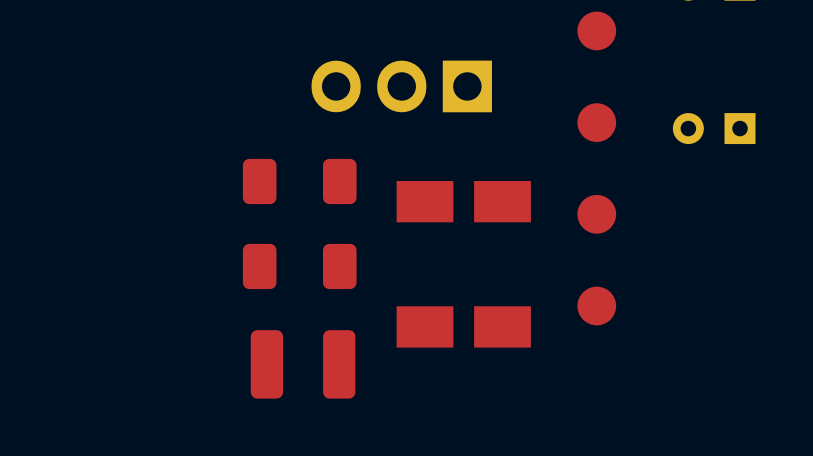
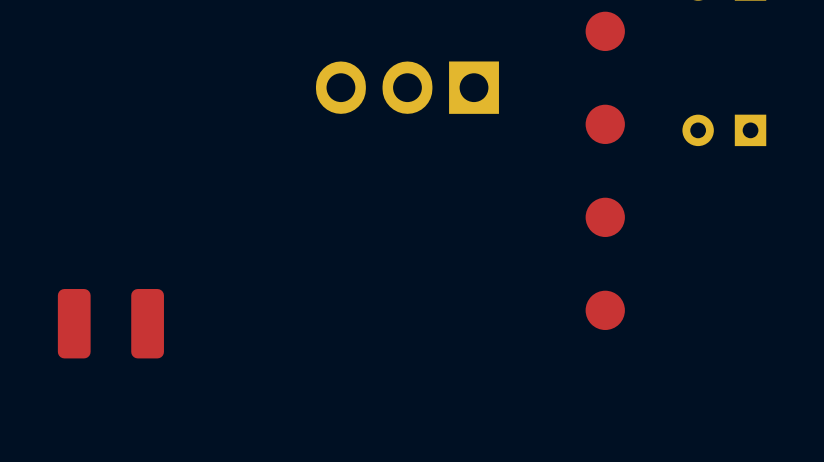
part: (299, 181) -> none
part: (463, 201) -> none
part: (299, 266) -> none
part: (463, 326) -> none
part position: (303, 364) -> (110, 323)

